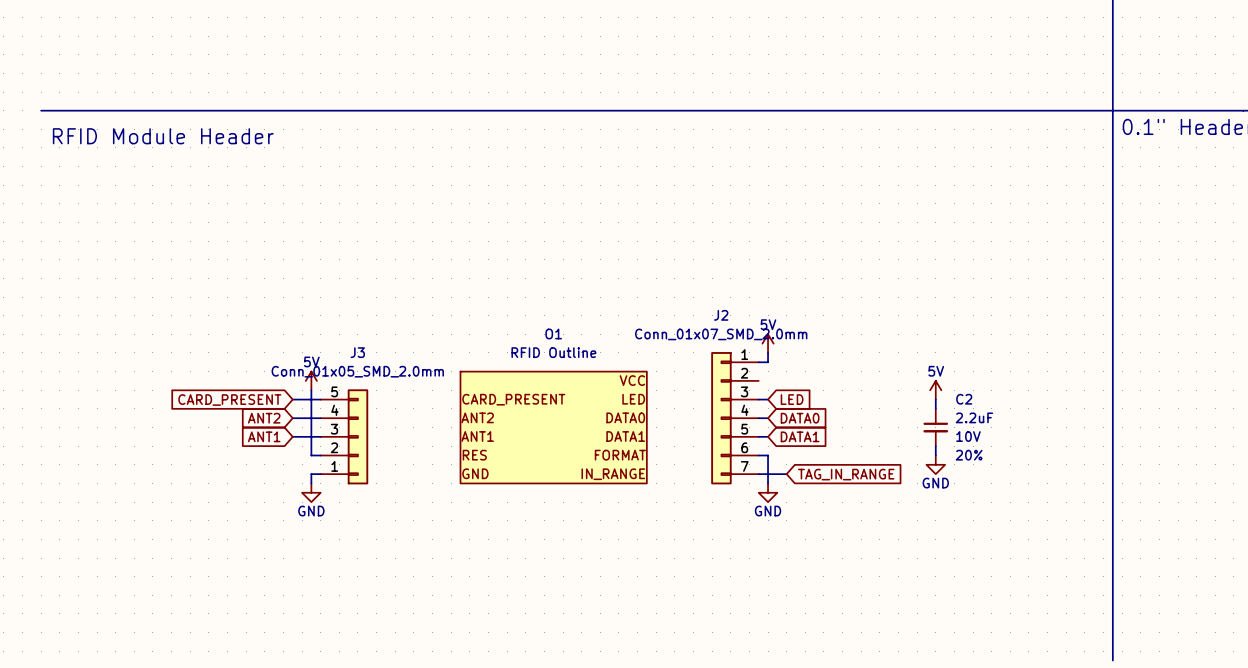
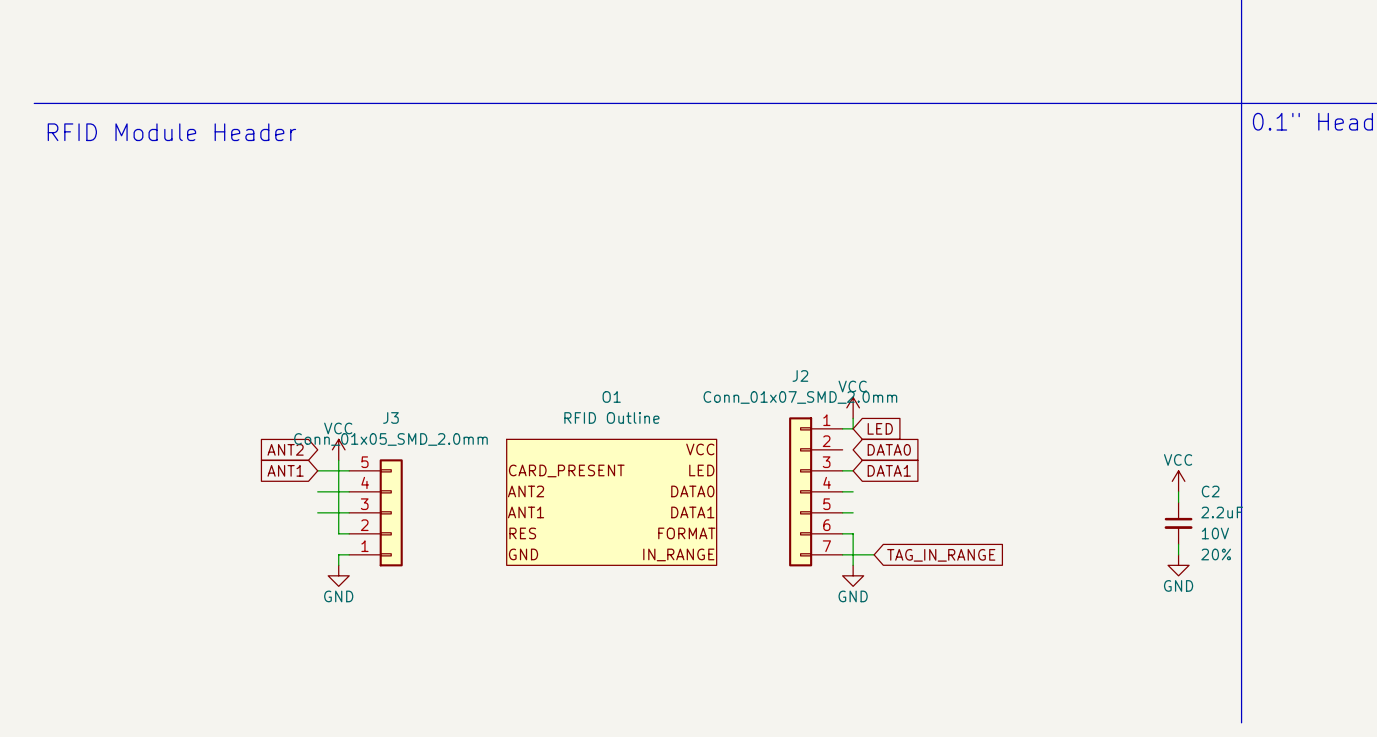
power symbol: 5V (768, 343) -> none
wire: (768, 352) (768, 362) (758, 362) -> none
power symbol: 5V (311, 380) -> none
power symbol: none -> VCC (853, 407)
wire: none -> (853, 418) (853, 428)
power symbol: 5V (935, 390) -> none
wire: (292, 399) (320, 399) -> none
wire: (935, 399) (935, 408) -> (1178, 491) (1178, 502)
global label: CARD_PRESENT (229, 400) -> none
wire: (292, 418) (320, 418) -> none
power symbol: none -> VCC (338, 449)
J2 position: (734, 418) -> (815, 491)
wire: (758, 418) (768, 418) -> none
O1 position: (553, 427) -> (611, 502)
C2 position: (935, 427) -> (1178, 523)
J3 position: (344, 436) -> (375, 512)
wire: (935, 446) (935, 455) -> (1178, 544) (1178, 554)
power symbol: none -> VCC (1178, 481)
wire: none -> (317, 491) (338, 491) (338, 512) (317, 512)
wire: (768, 455) (768, 483) -> none
power symbol: GND (935, 464) -> none
wire: (768, 474) (786, 474) -> none
global label position: TAG_IN_RANGE (846, 474) -> TAG_IN_RANGE (941, 555)
power symbol position: GND (311, 492) -> GND (338, 575)
wire: none -> (842, 533) (853, 533) (853, 565)
power symbol position: GND (768, 492) -> GND (853, 575)
wire: none -> (349, 554) (338, 554) (338, 565)
wire: none -> (842, 554) (874, 554)
power symbol: none -> GND (1178, 565)

